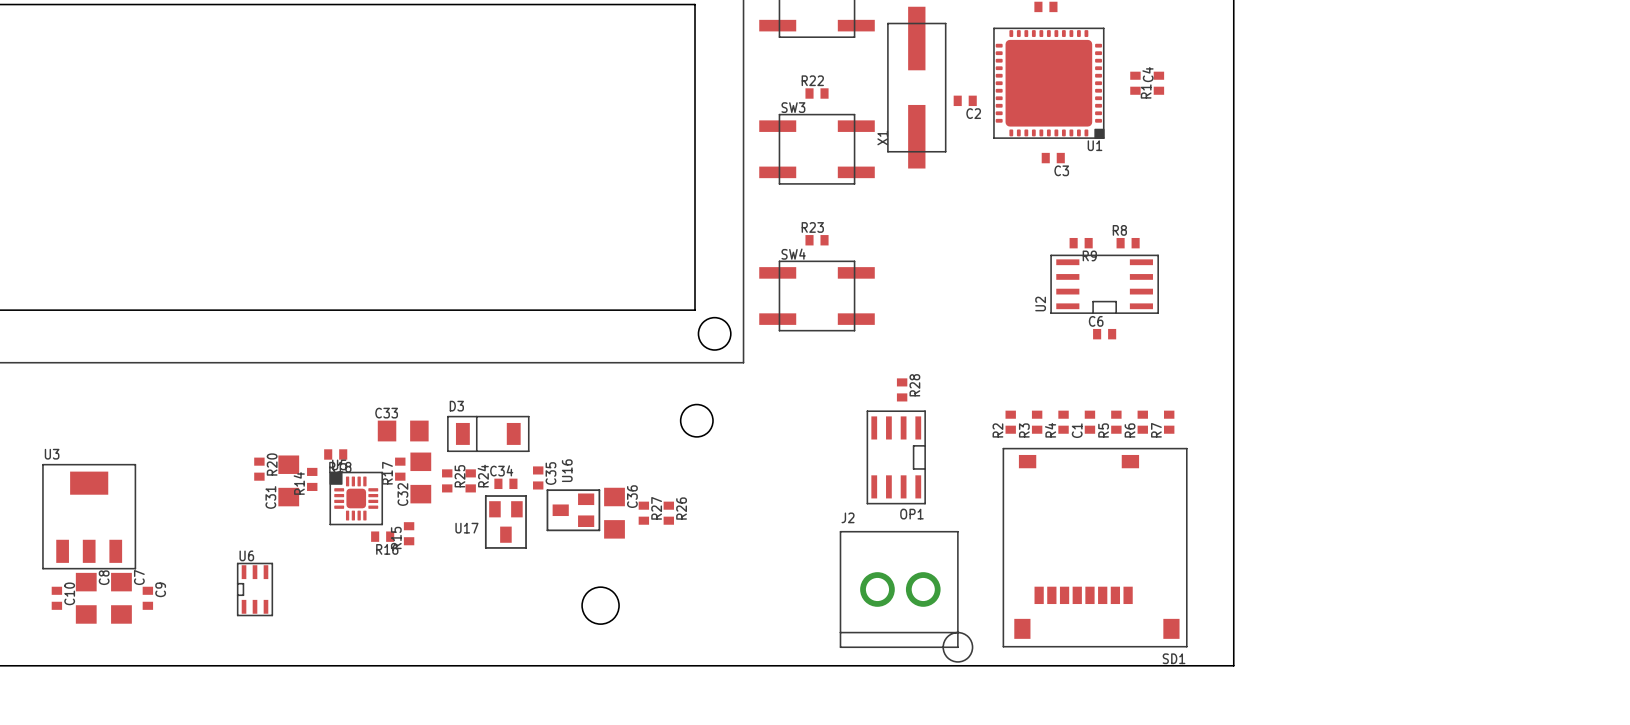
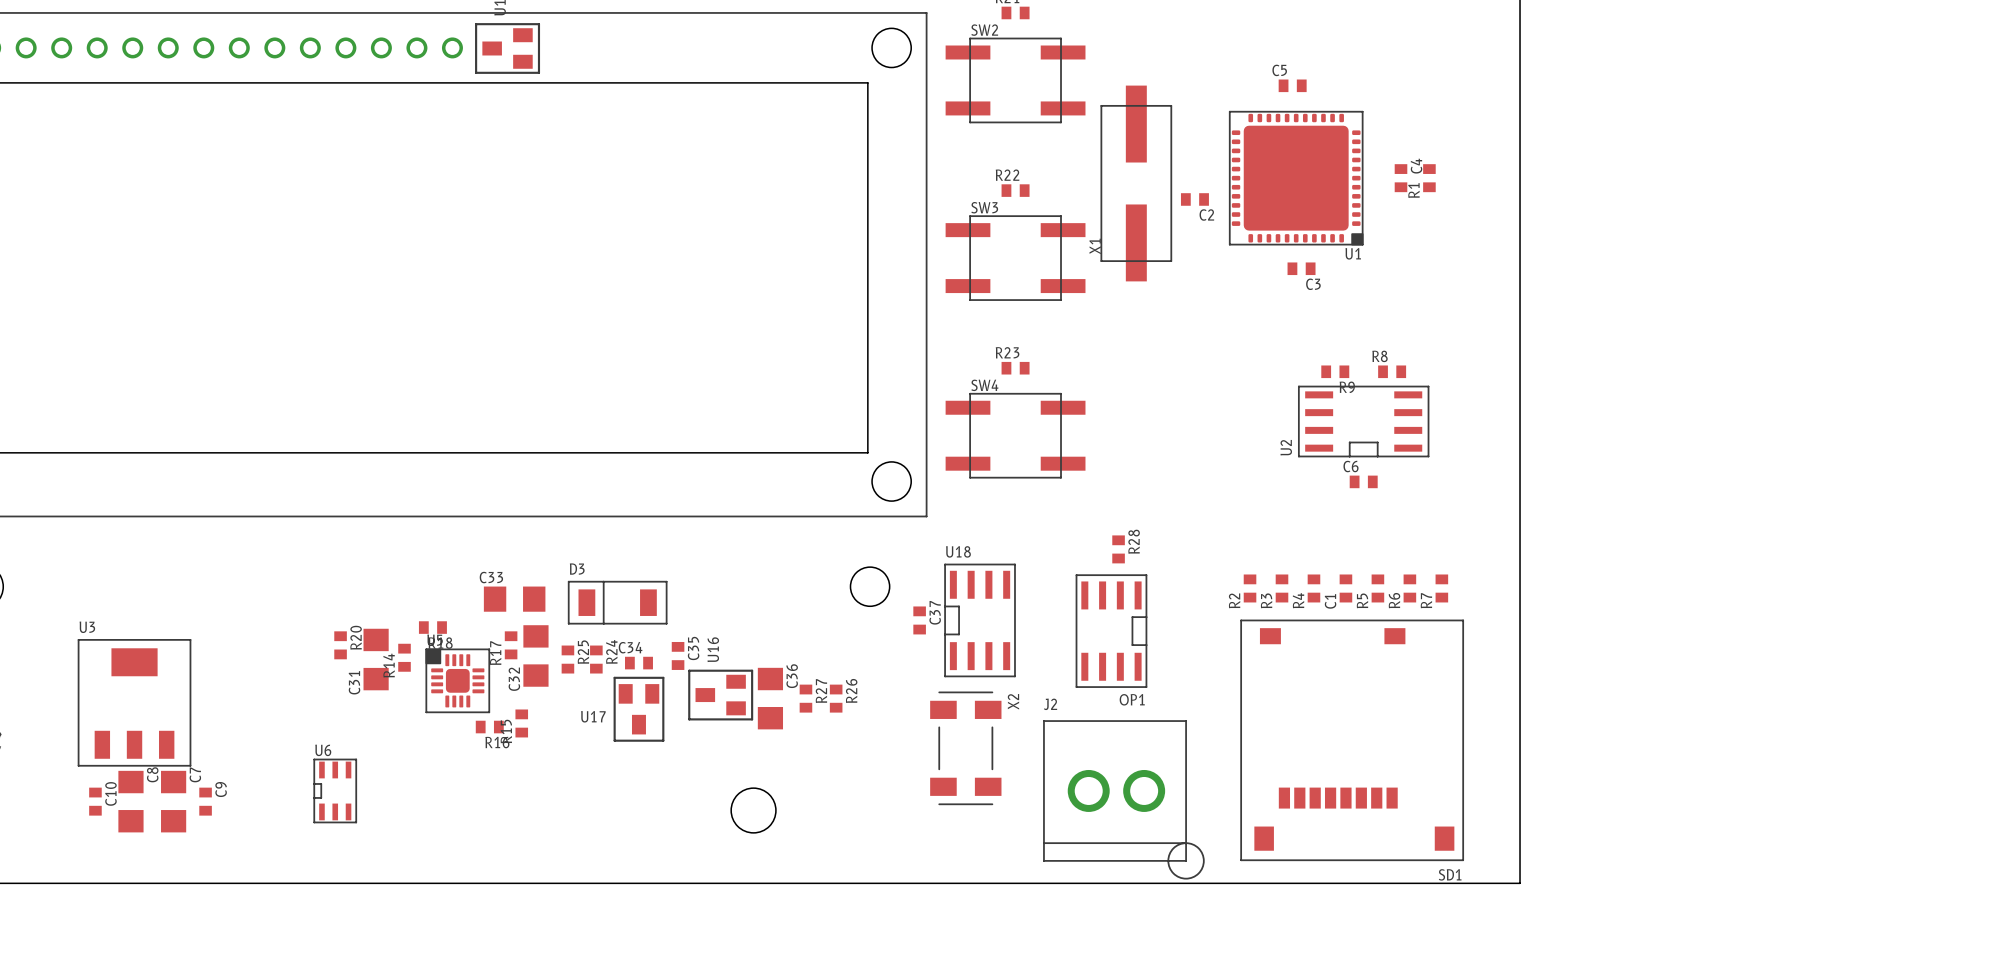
C37: none -> (919, 620)
U18: none -> (980, 620)
X2: none -> (965, 748)

